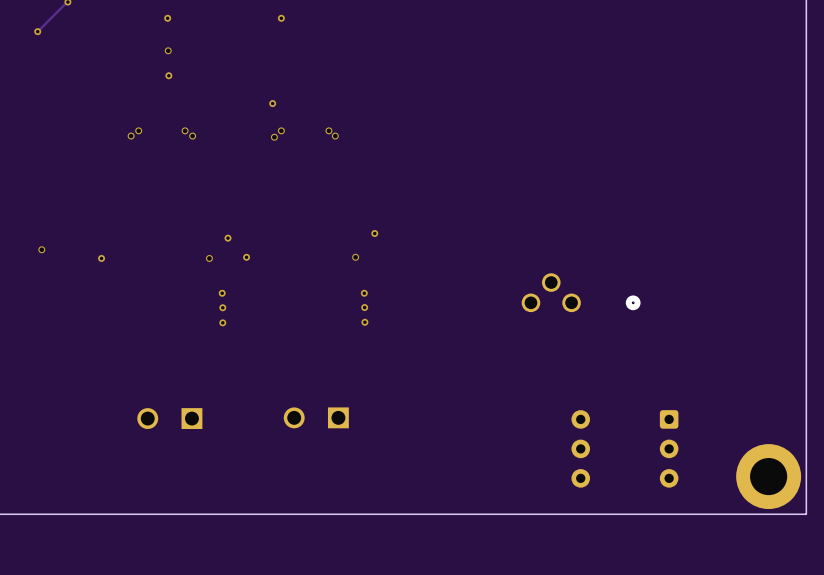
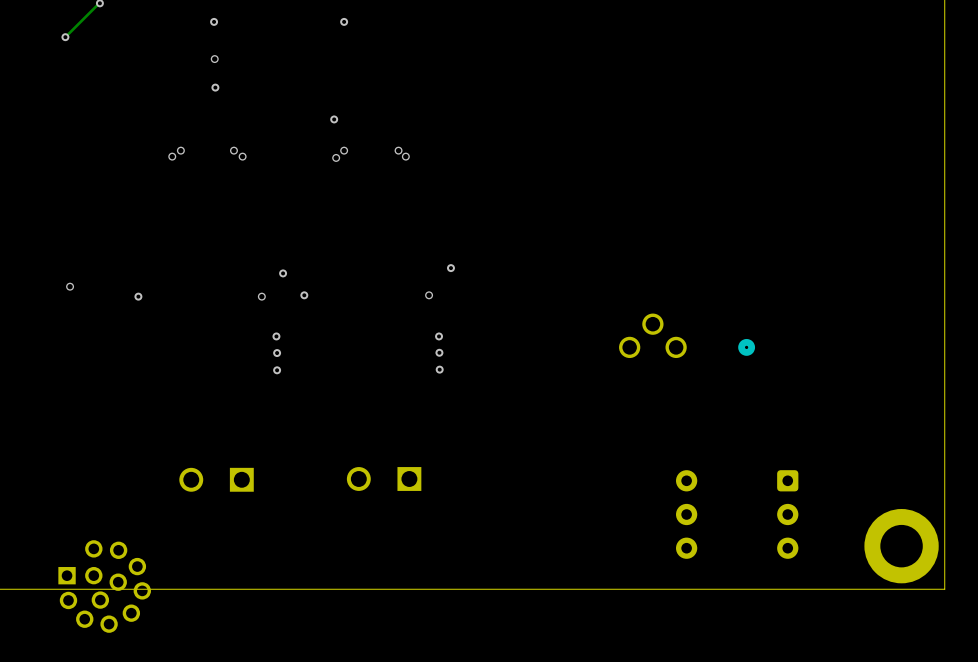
part: none -> (104, 586)

